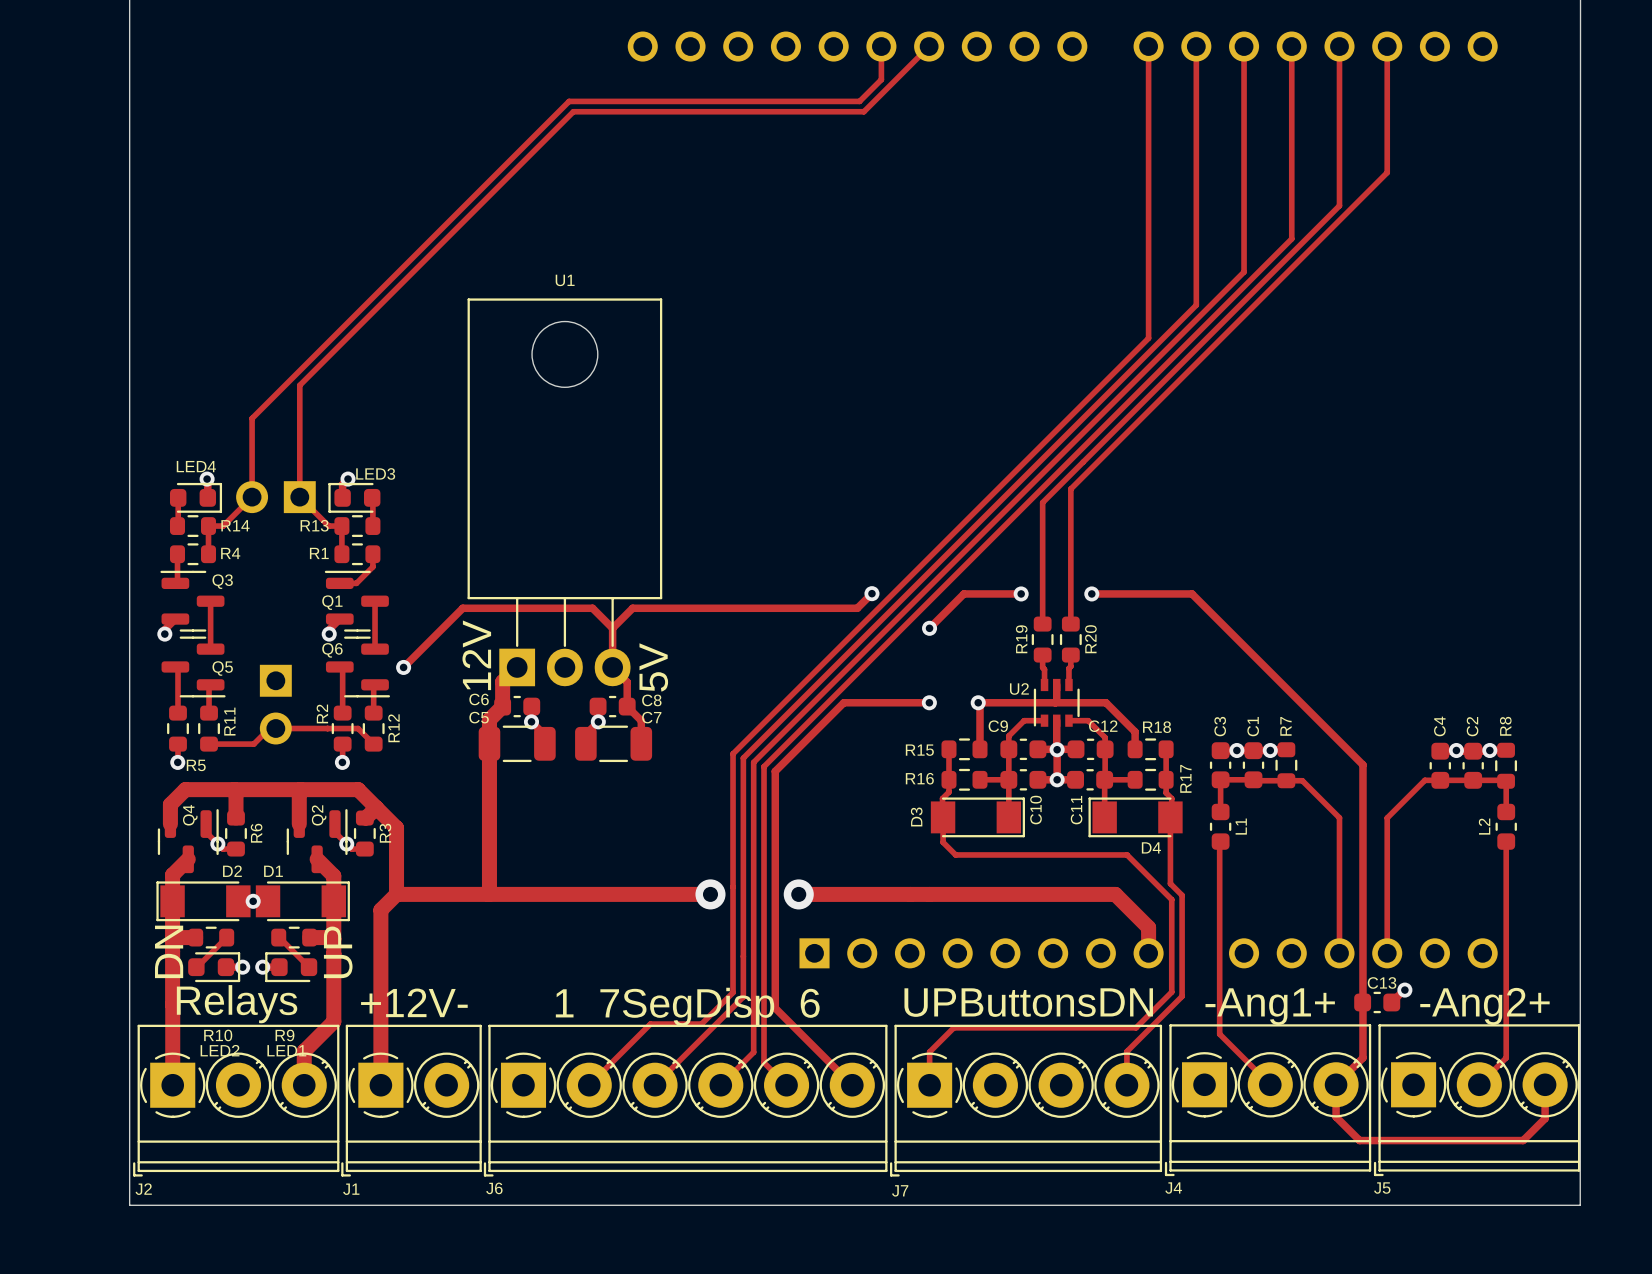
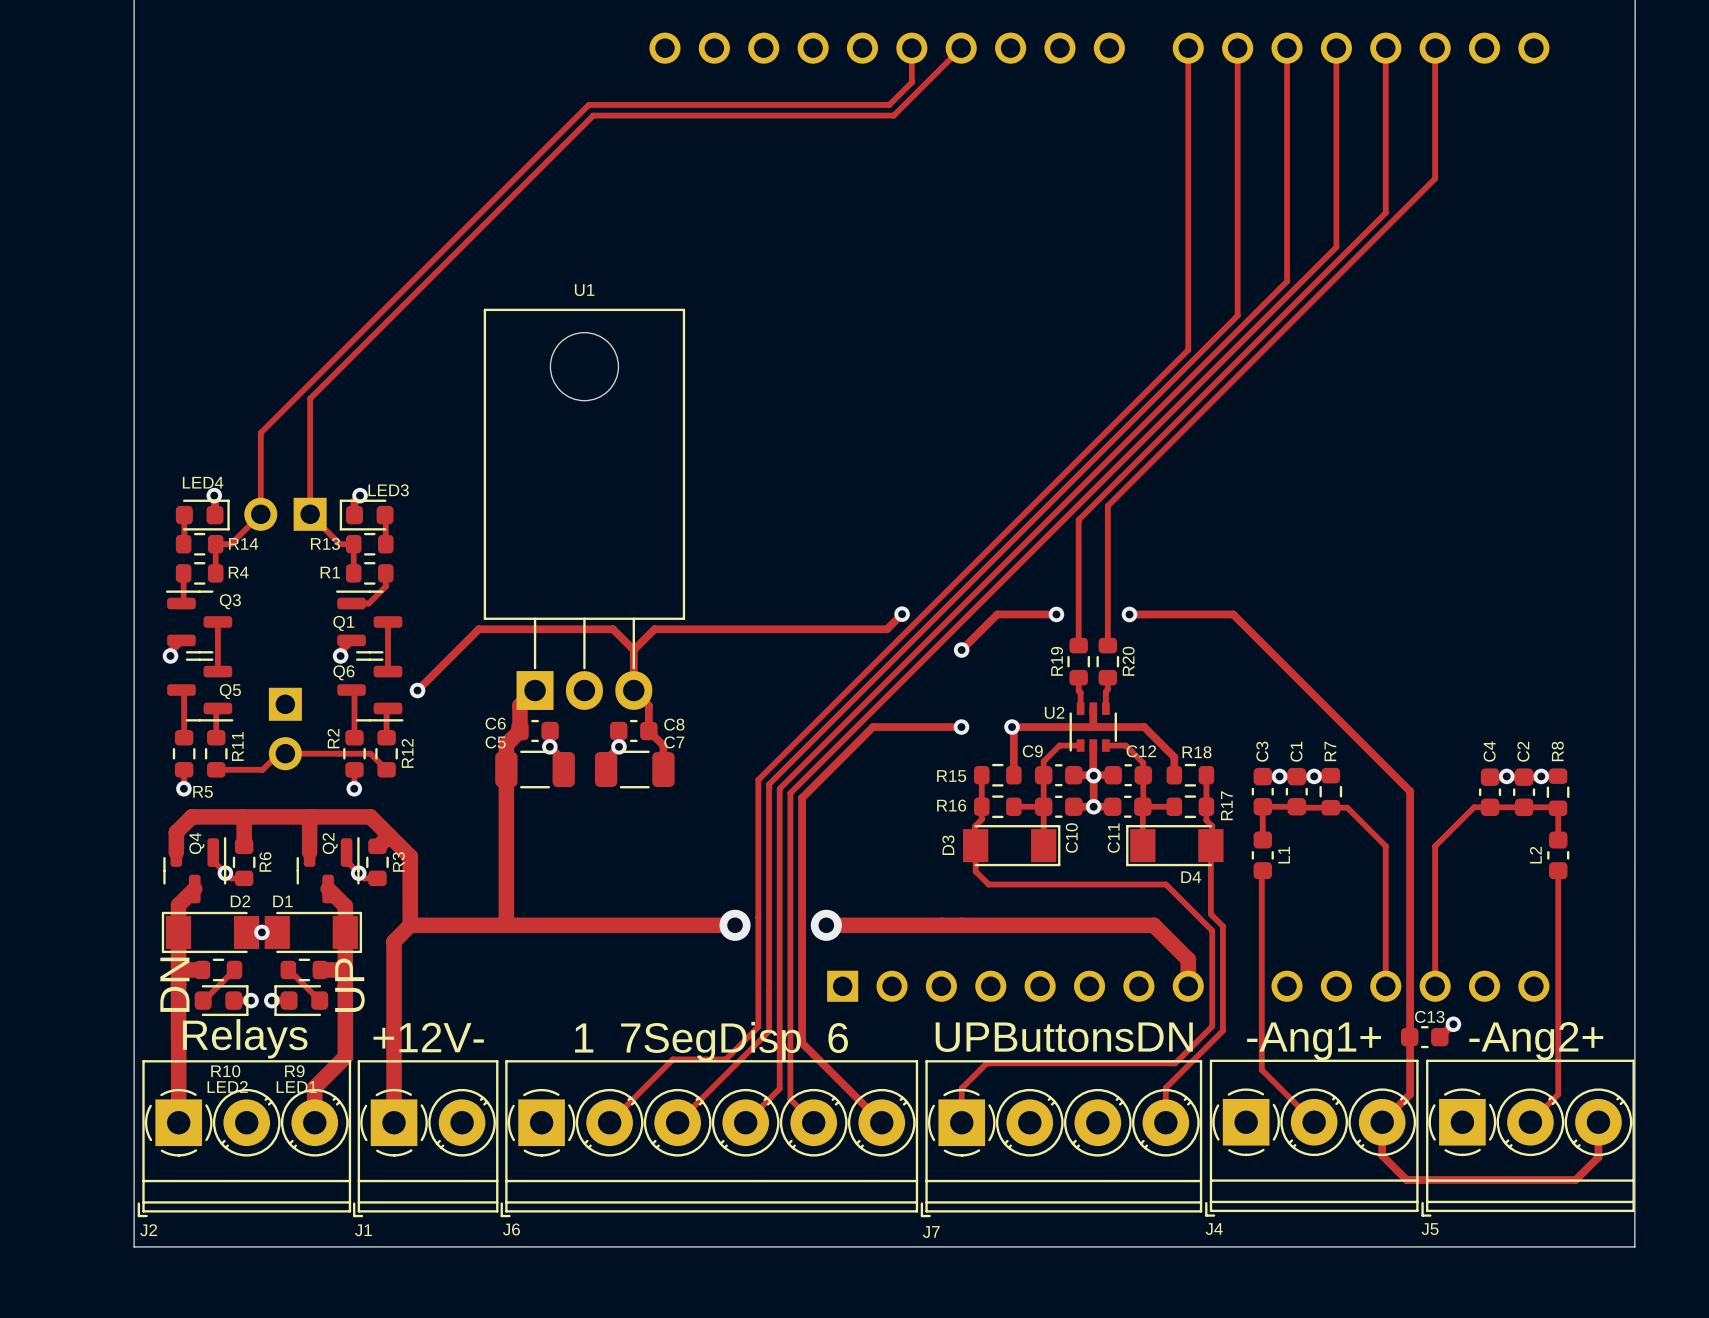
text: 12V (476, 655) -> none
text: 5V (653, 667) -> none

